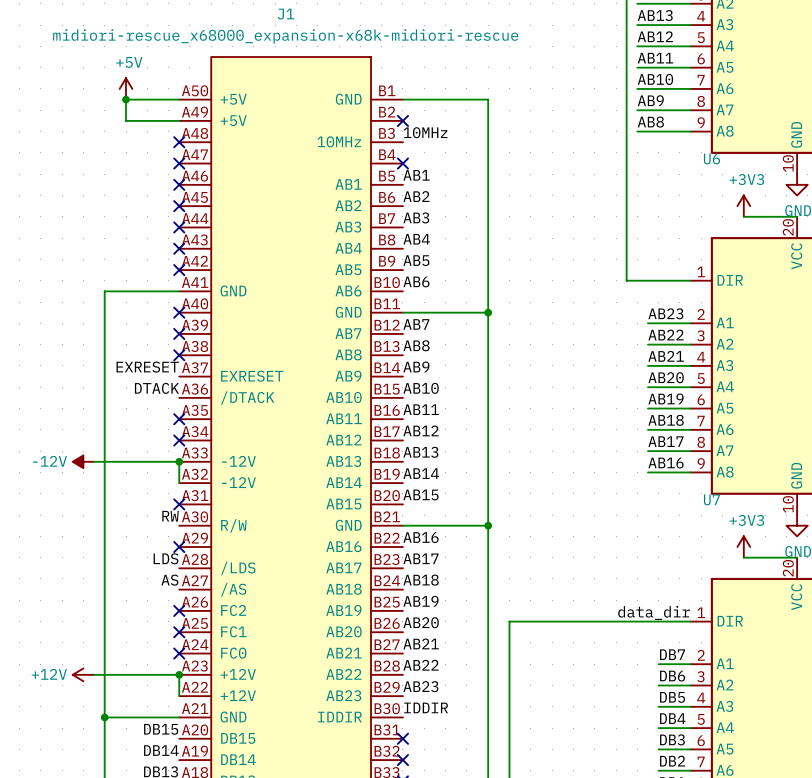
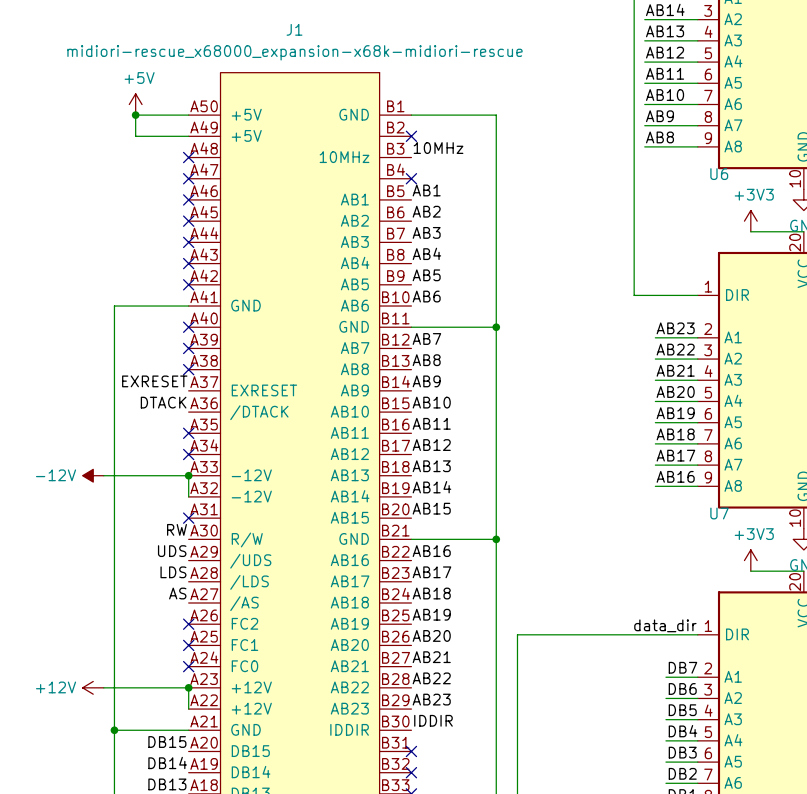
label: none -> UDS (172, 551)
no-connect mark: (179, 547) -> none
J1 pin name: none -> /UDS (250, 561)

